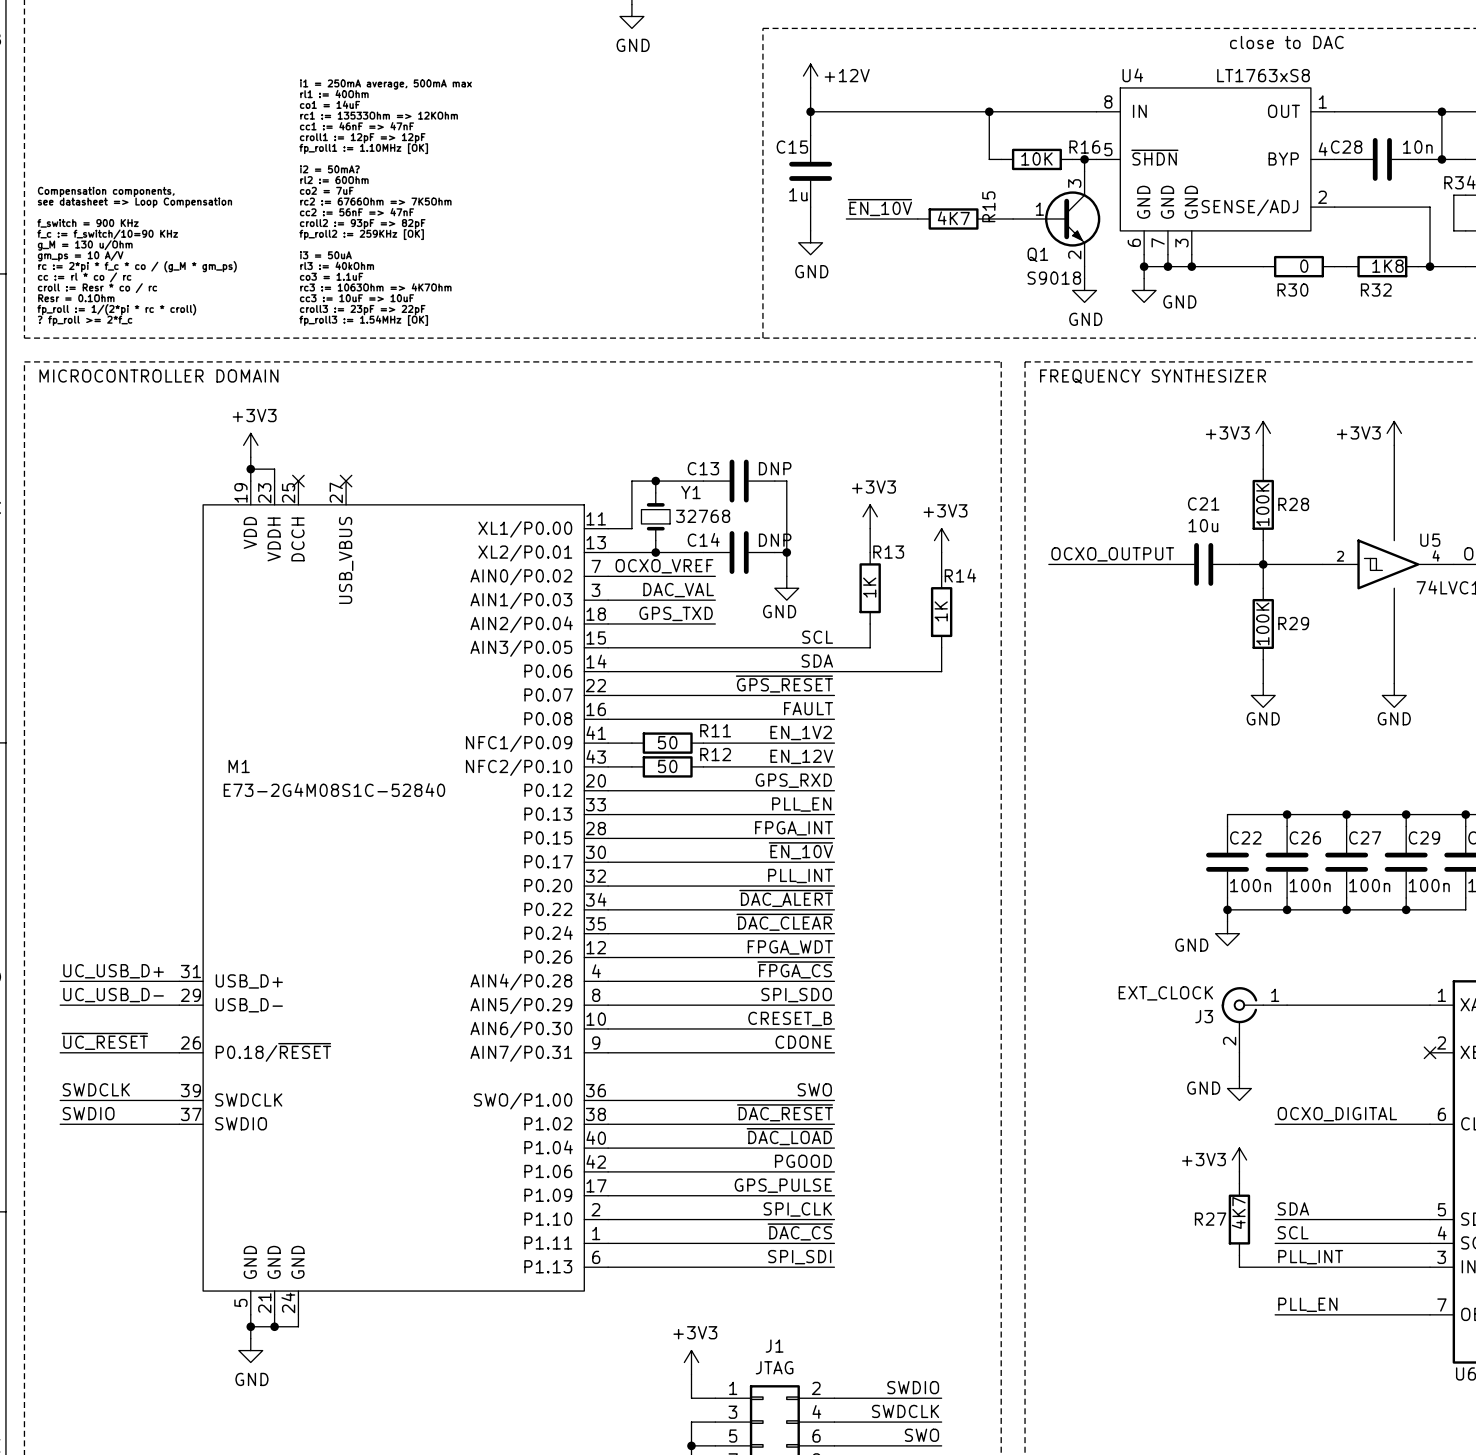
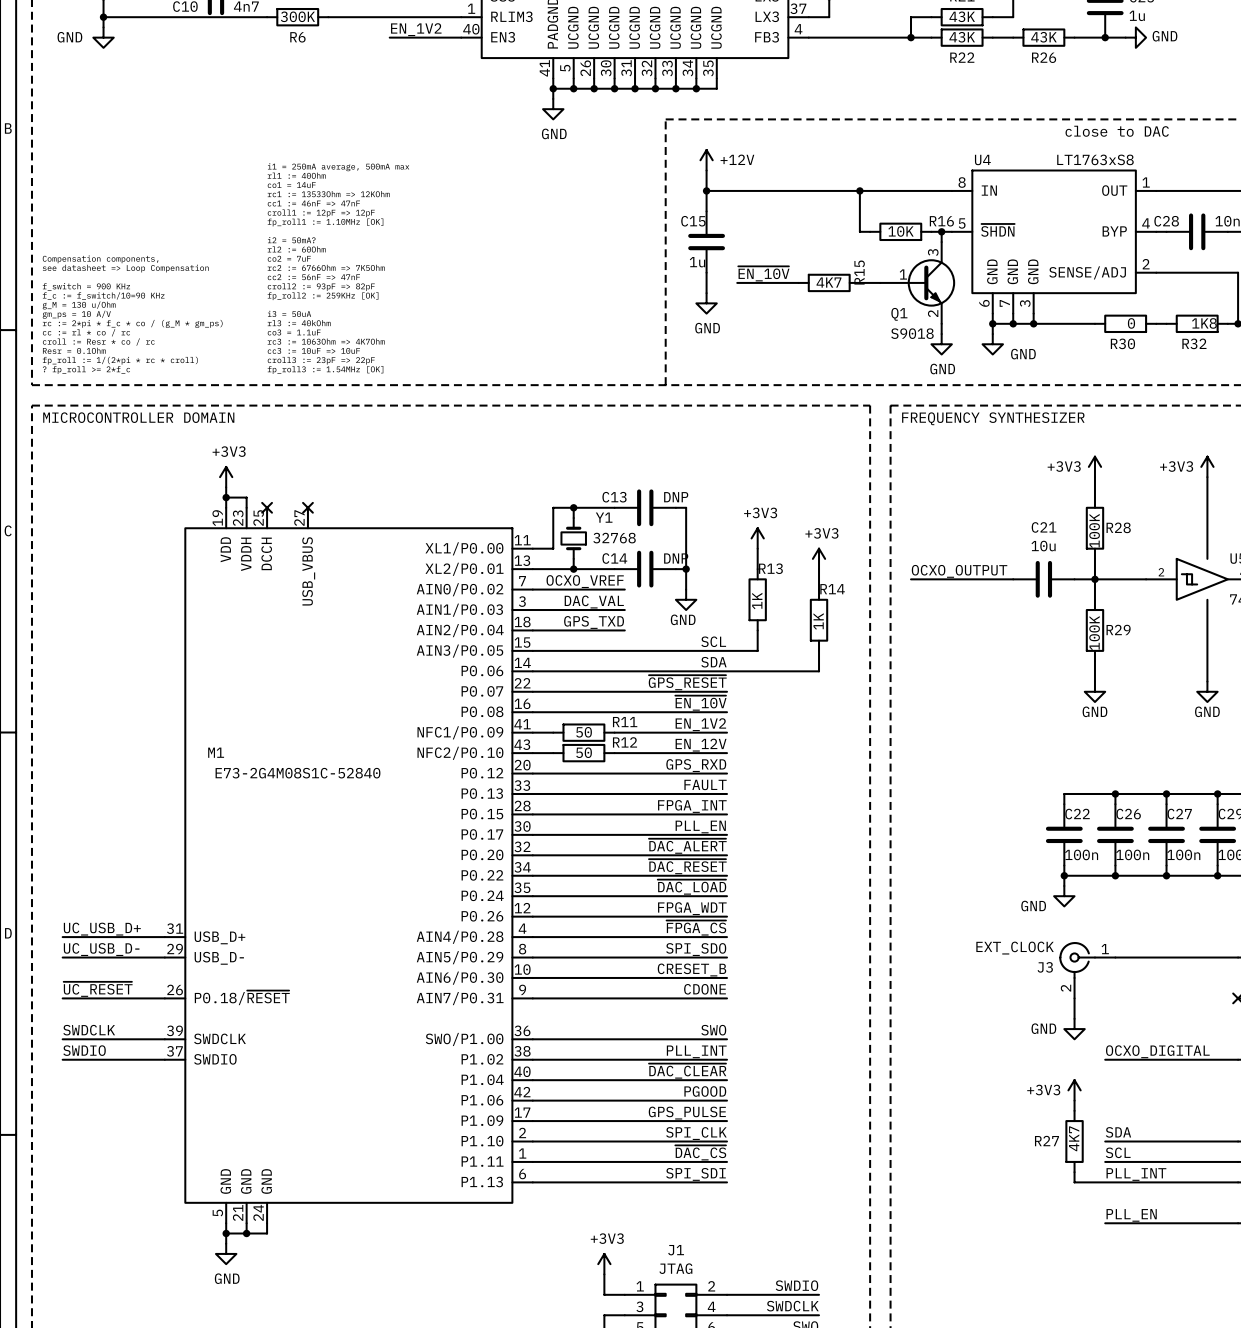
label: FAULT (808, 708) -> ~{EN_10V} (700, 703)
label: PLL_EN (801, 804) -> FAULT (705, 784)
label: ~{EN_10V} (800, 850) -> PLL_EN (700, 826)
label: PLL_INT (800, 875) -> ~{DAC_ALERT} (687, 846)
label: ~{DAC_ALERT} (786, 898) -> ~{DAC_RESET} (687, 866)
label: ~{DAC_CLEAR} (784, 922) -> ~{DAC_LOAD} (691, 887)
label: ~{DAC_RESET} (785, 1112) -> PLL_INT (696, 1051)
label: ~{DAC_LOAD} (789, 1136) -> ~{DAC_CLEAR} (687, 1071)

